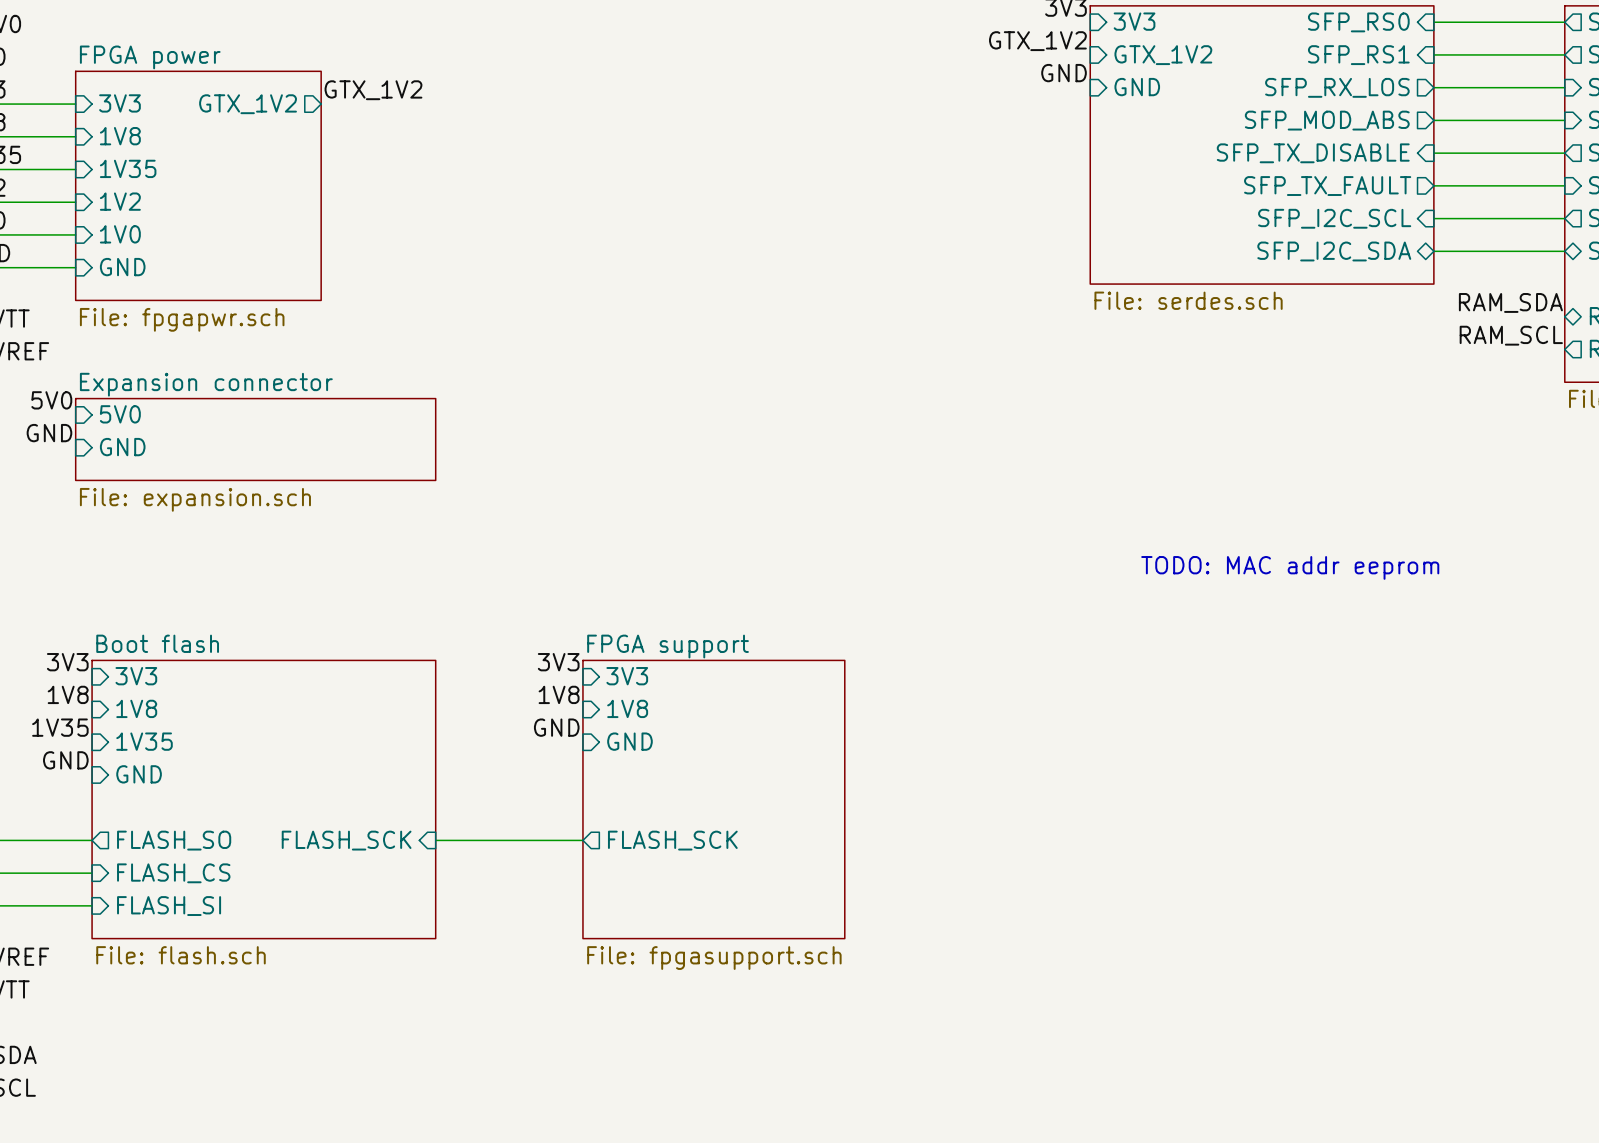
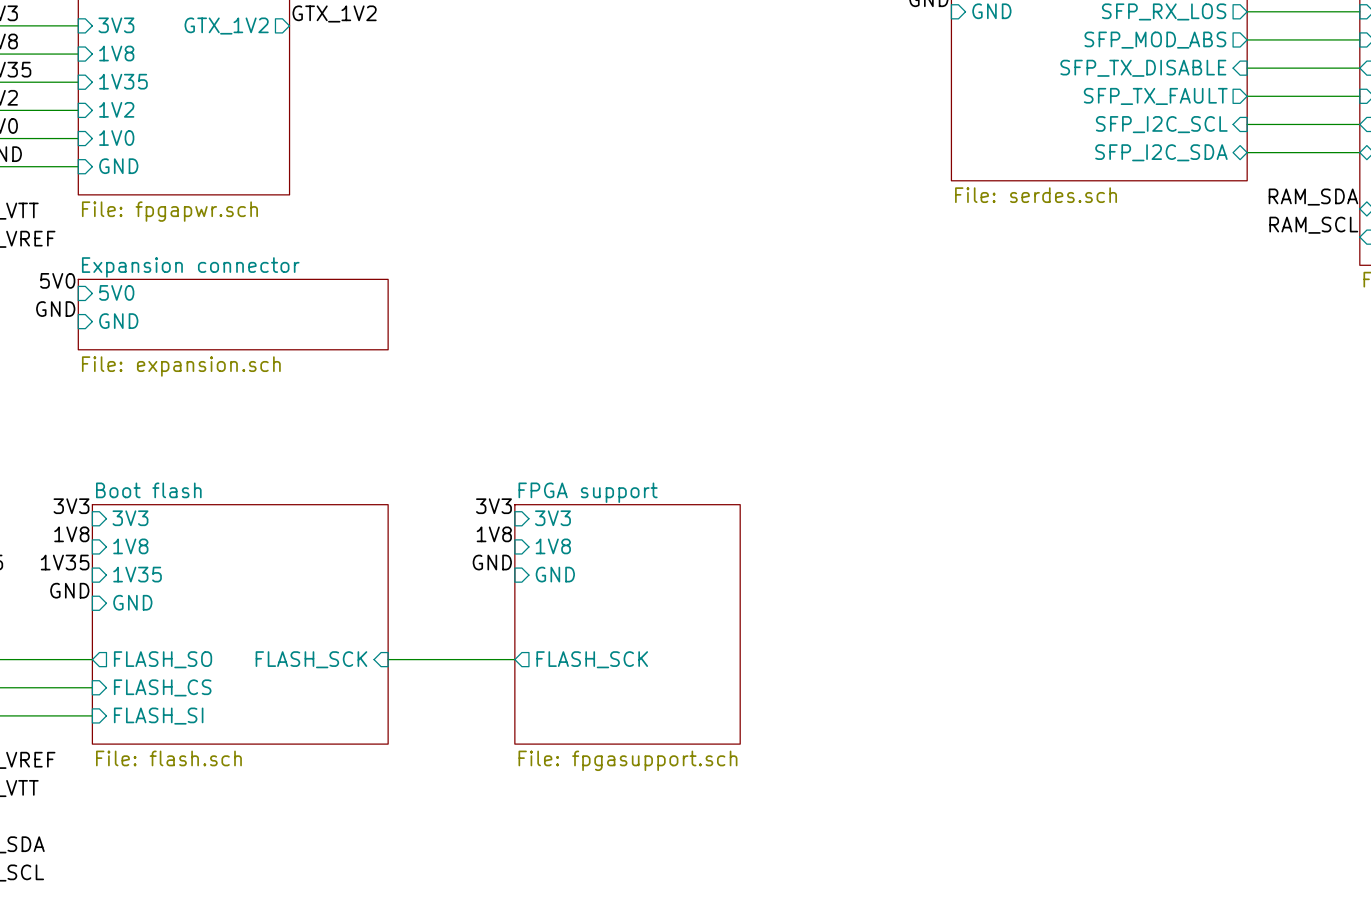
text: TODO: MAC addr eeprom (1290, 567) -> none

